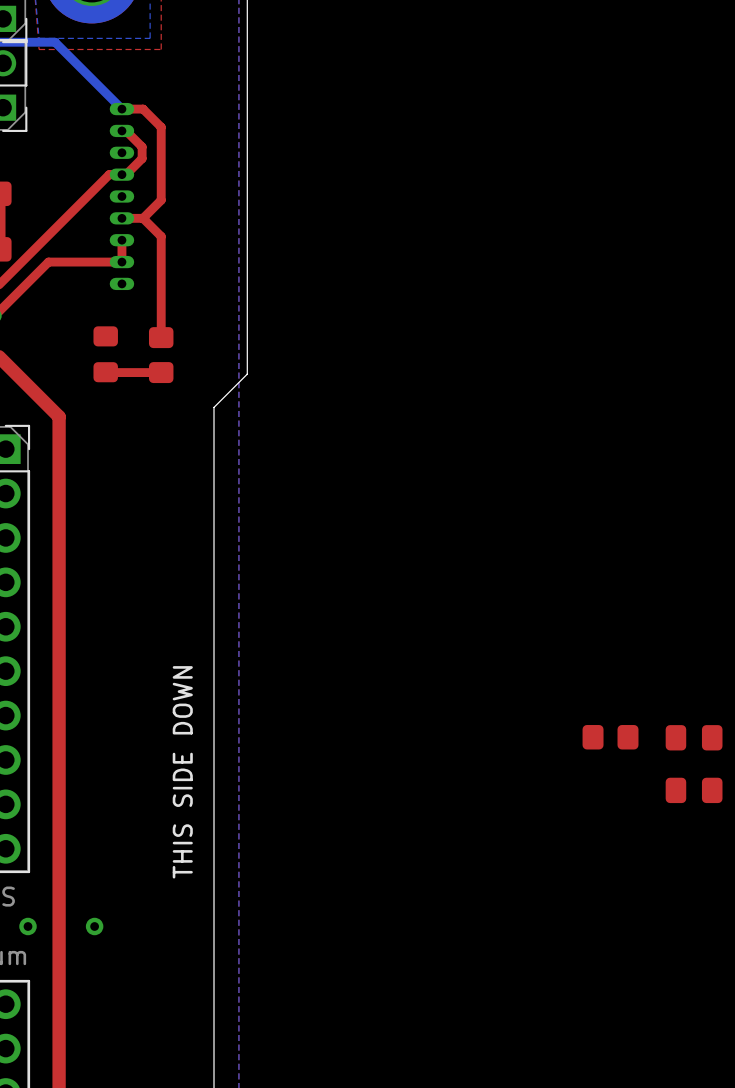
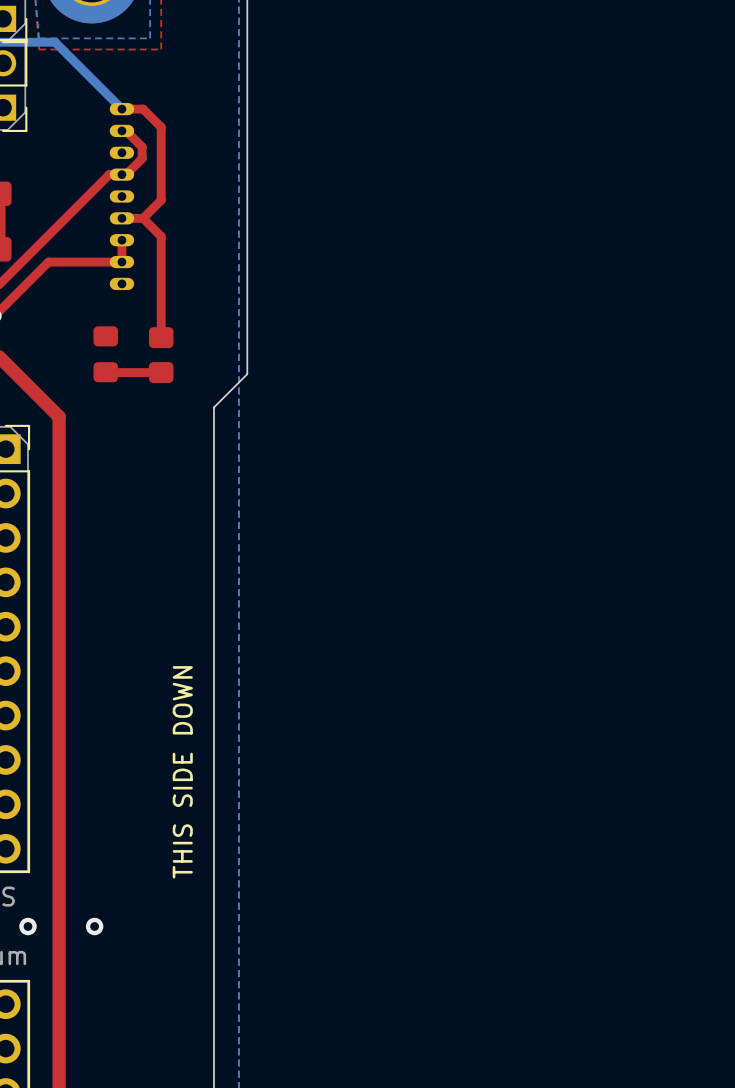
part: (610, 737) -> none
part: (694, 737) -> none
part: (694, 790) -> none

